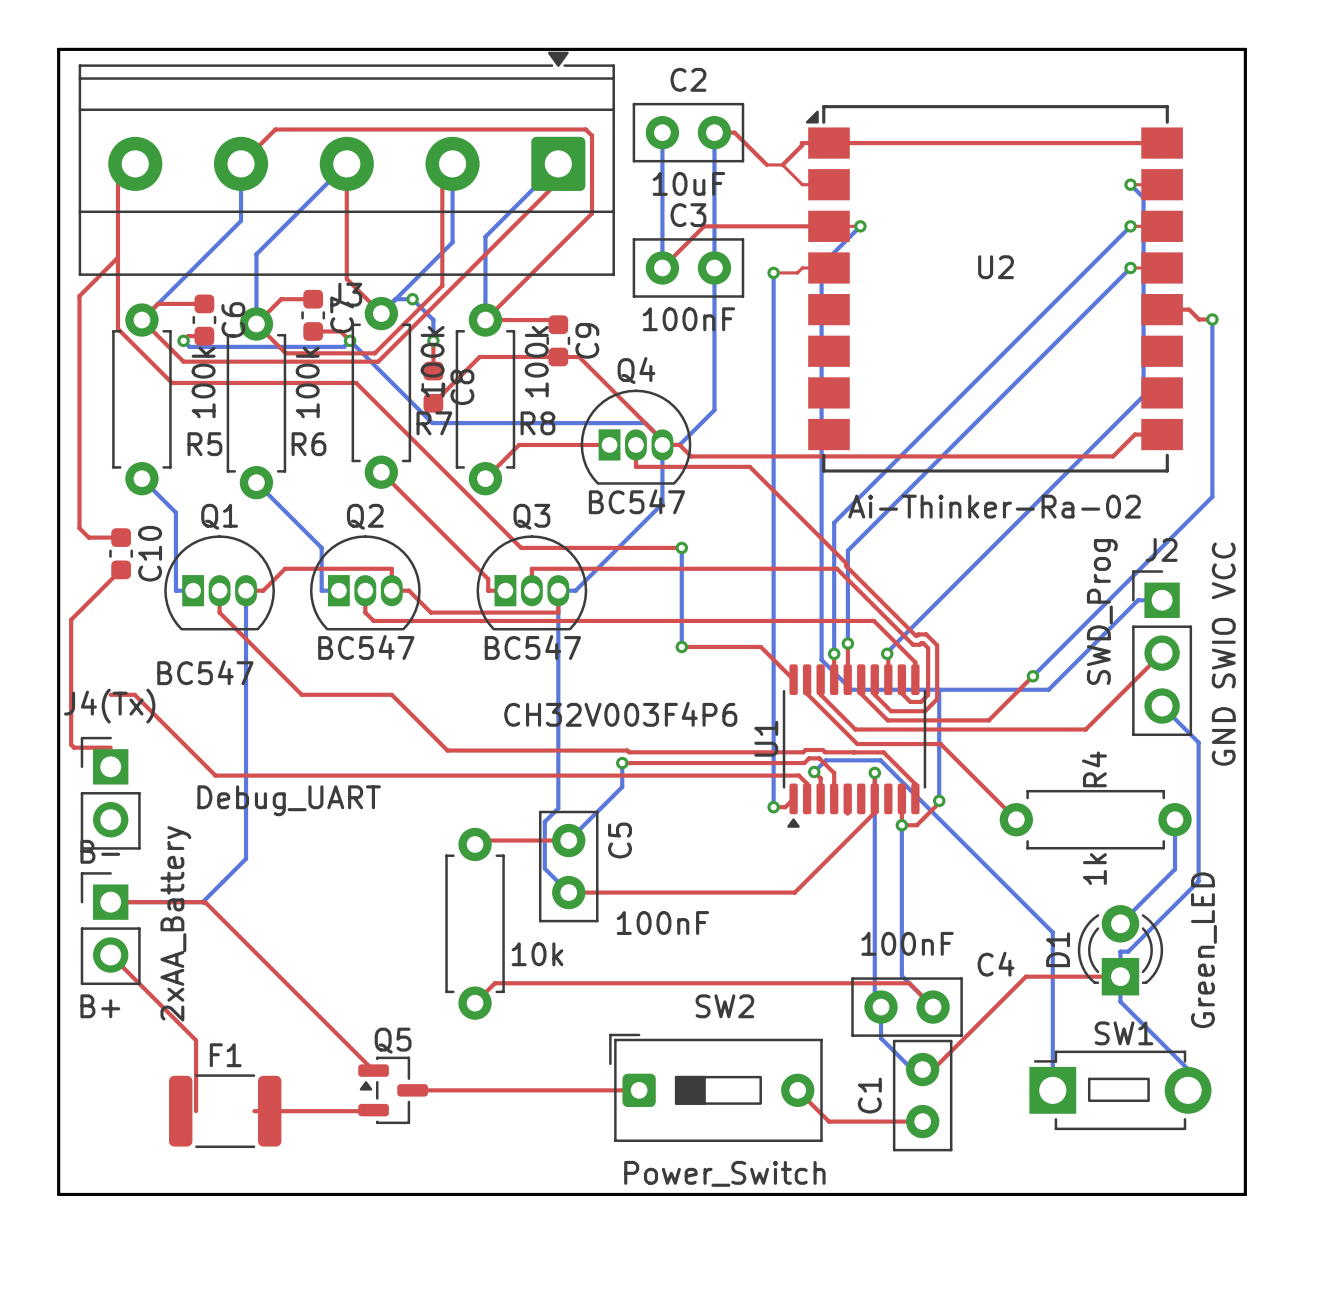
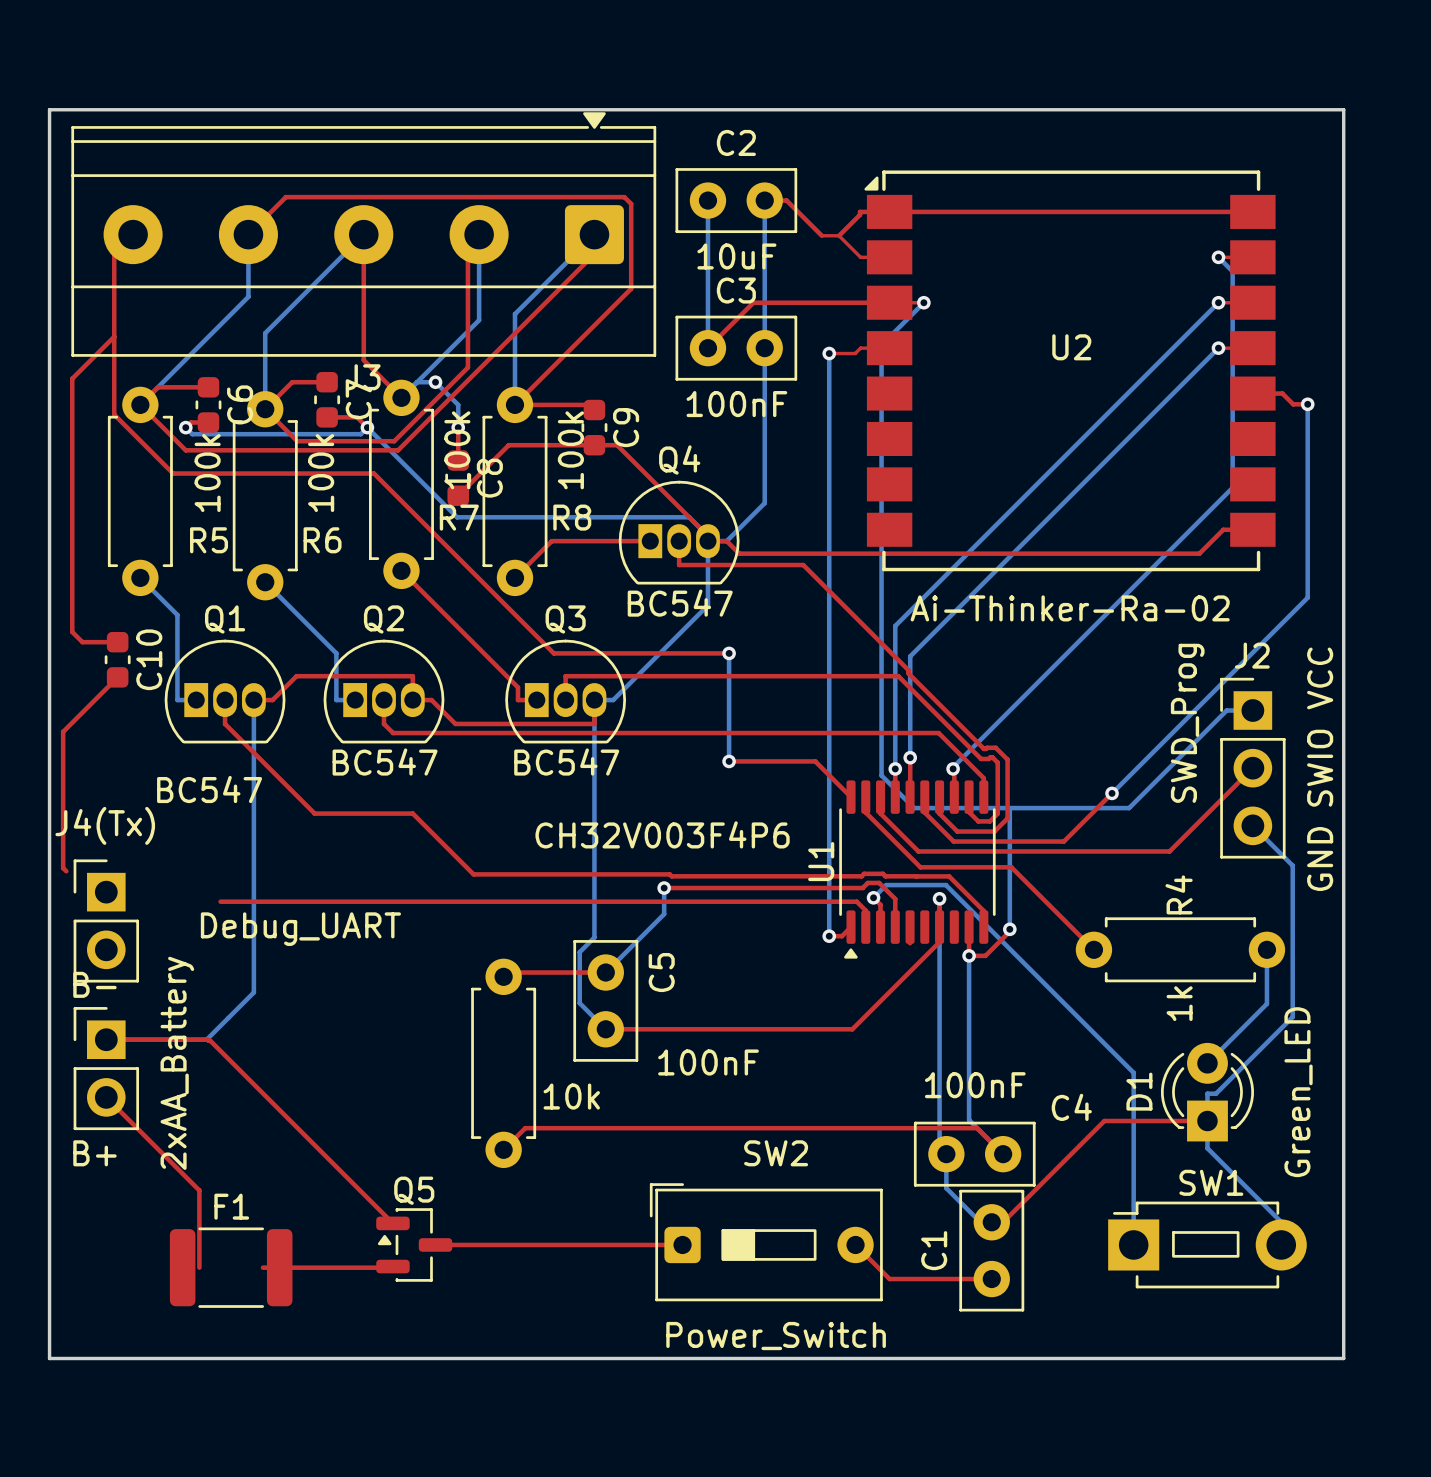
top track: (110, 694) (134, 694) (215, 775) -> none
top track: (74, 747) (110, 747) -> none

